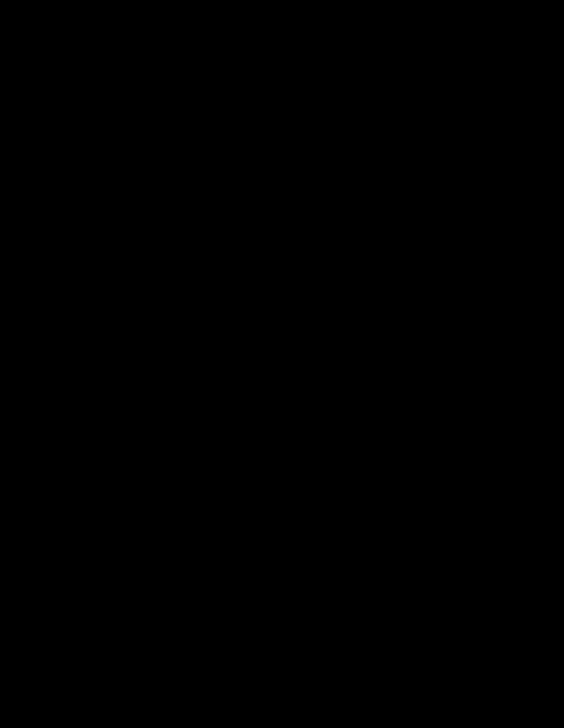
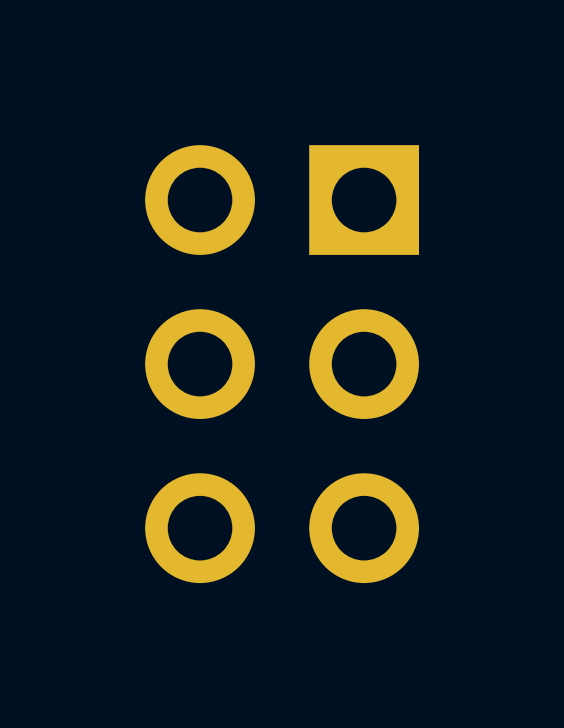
part: none -> (282, 364)

